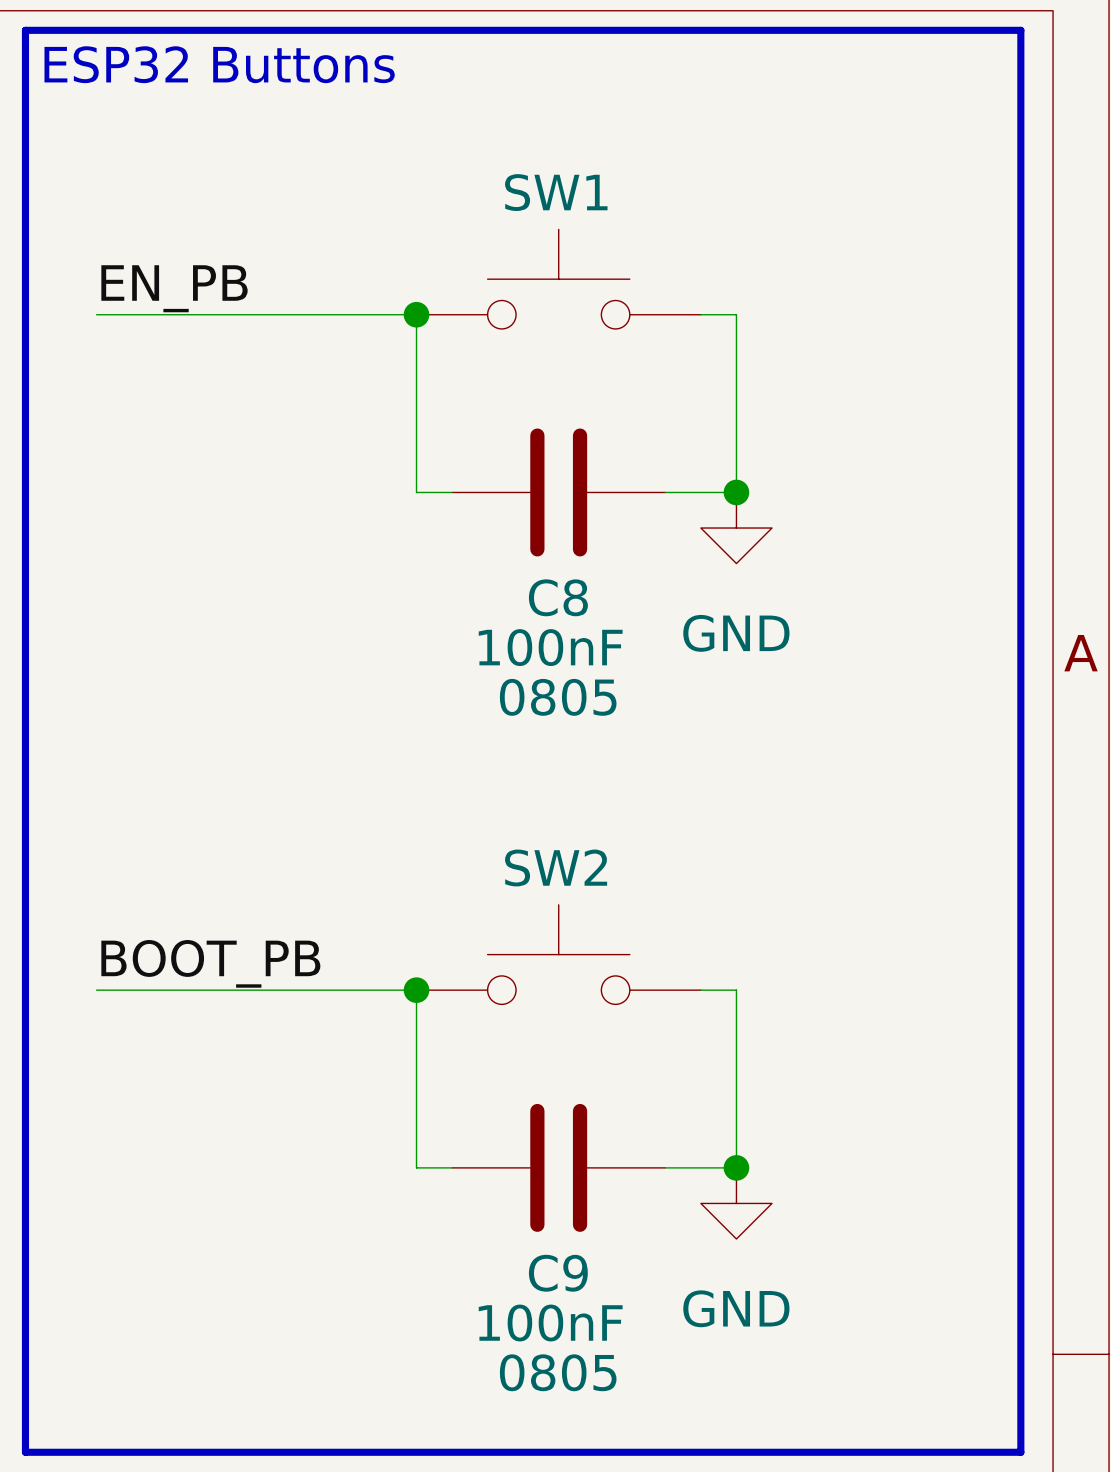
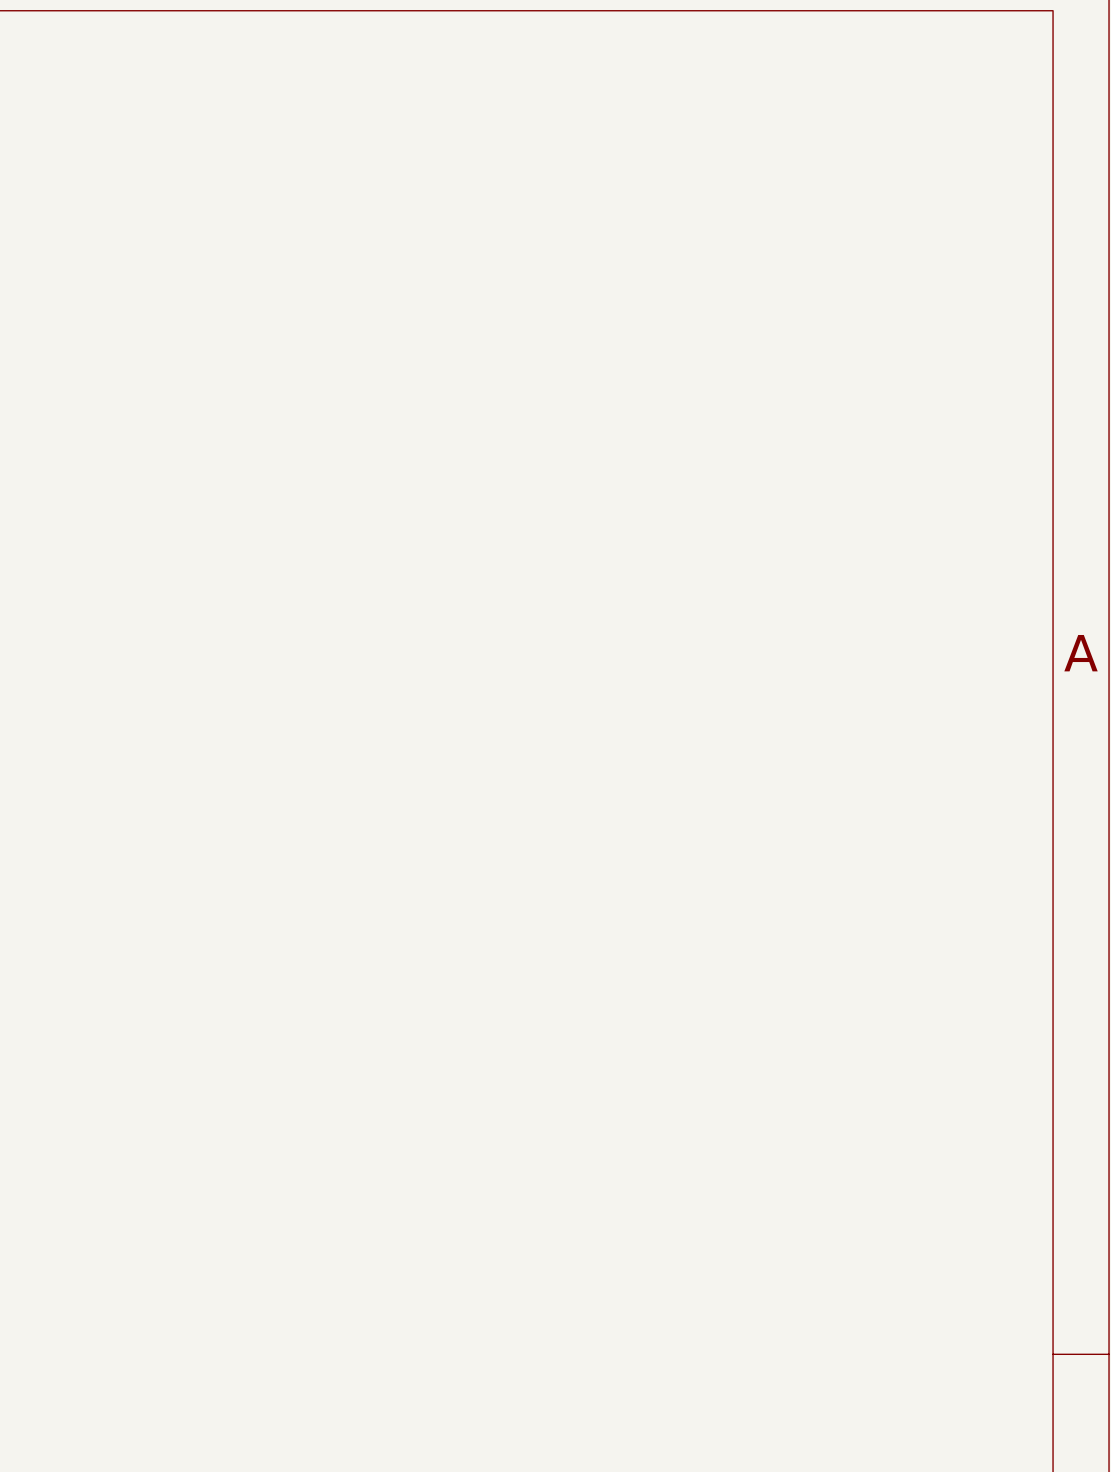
line: (25, 30) (1020, 30) (1020, 1452) (25, 1452) (25, 30) -> none
text: ESP32 Buttons (219, 64) -> none
SW1: (558, 279) -> none
label: EN_PB (174, 288) -> none
wire: (96, 314) (416, 314) (416, 492) (452, 492) -> none
junction: (416, 314) -> none
wire: (700, 314) (736, 314) (736, 492) (665, 492) -> none
C8: 100nF (558, 492) -> none
junction: (736, 492) -> none
power symbol: GND (736, 528) -> none
SW2: (558, 954) -> none
label: BOOT_PB (210, 963) -> none
wire: (96, 990) (416, 990) (416, 1167) (452, 1167) -> none
junction: (416, 990) -> none
wire: (700, 990) (736, 990) (736, 1167) (665, 1167) -> none
C9: 100nF (558, 1167) -> none
junction: (736, 1167) -> none
power symbol: GND (736, 1203) -> none

